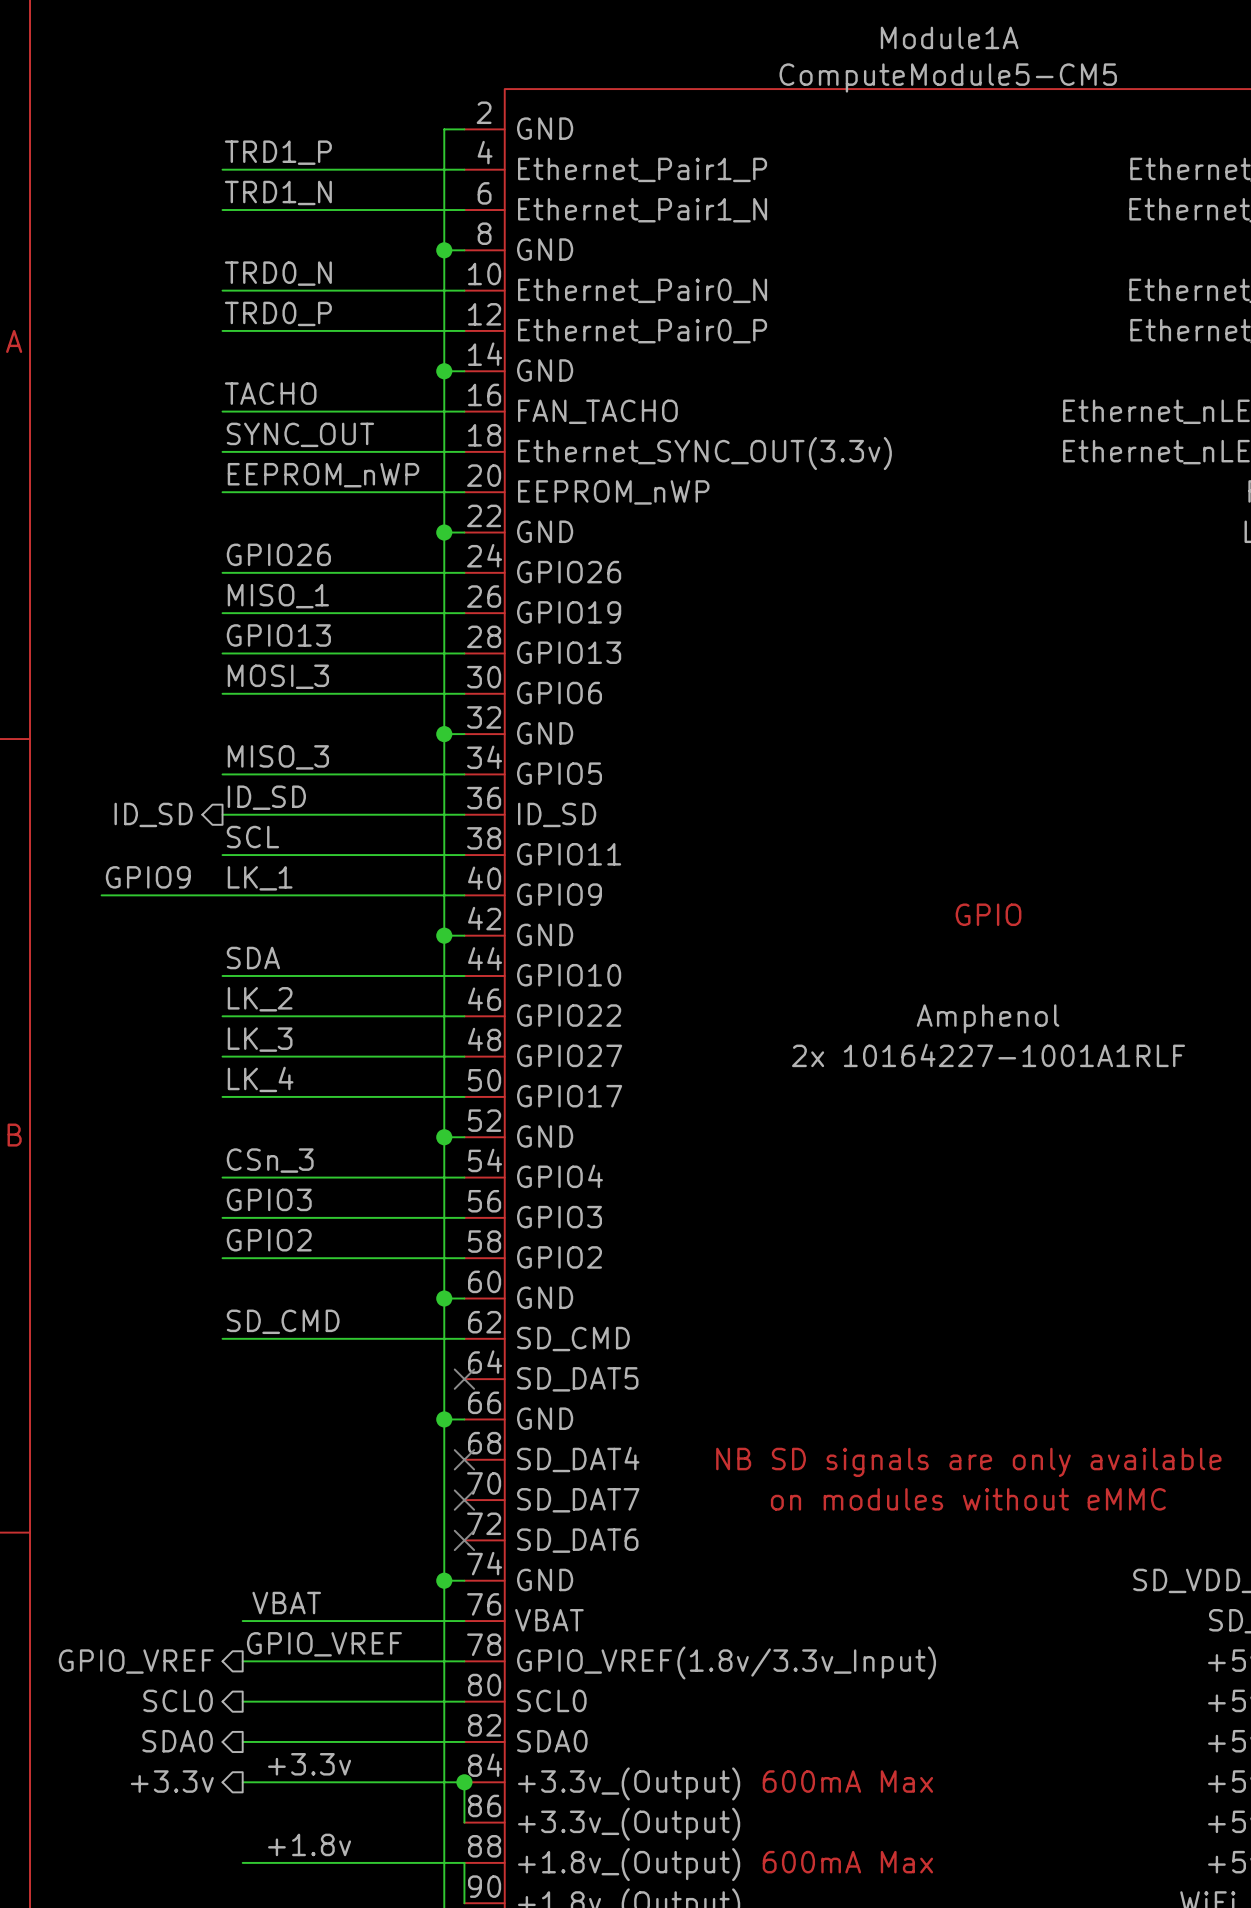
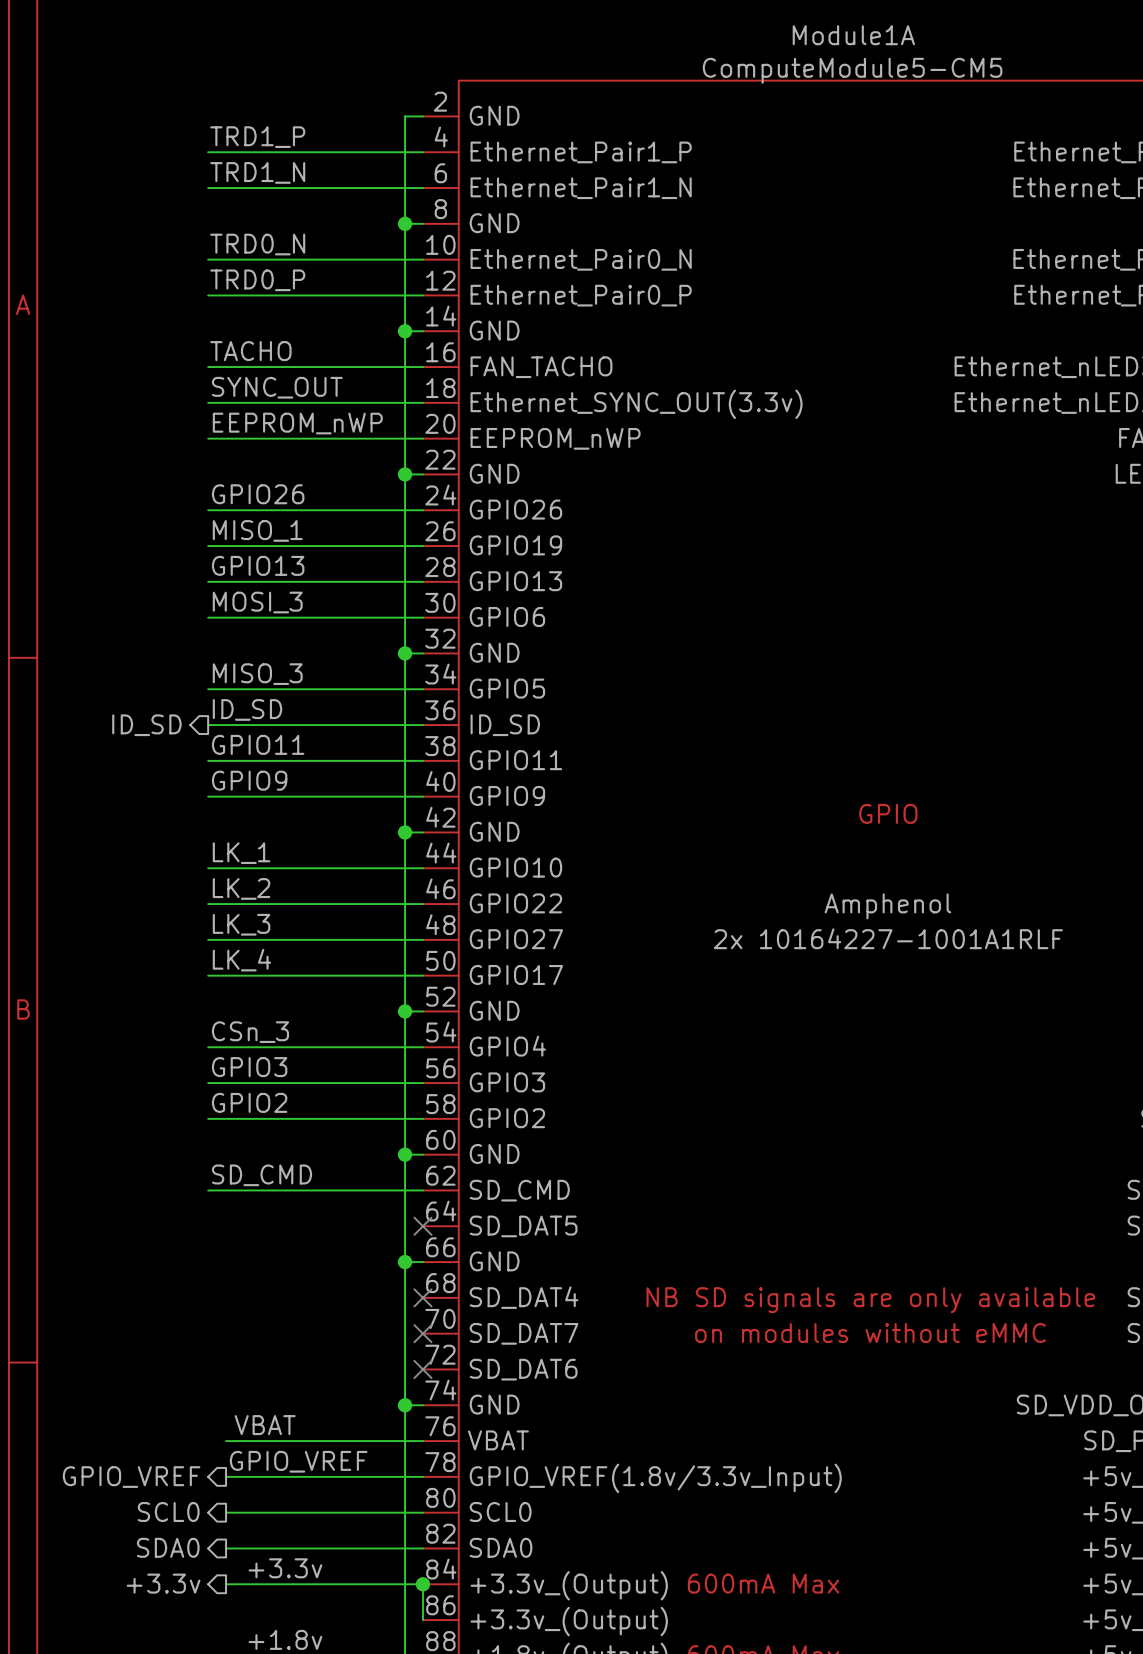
label: SCL (252, 837) -> GPIO11 (258, 744)
label: GPIO9 (148, 877) -> none
label: LK_1 (260, 878) -> GPIO9 (249, 780)
wire: (101, 895) (222, 895) -> none
label: SDA (253, 958) -> LK_1 (241, 853)

